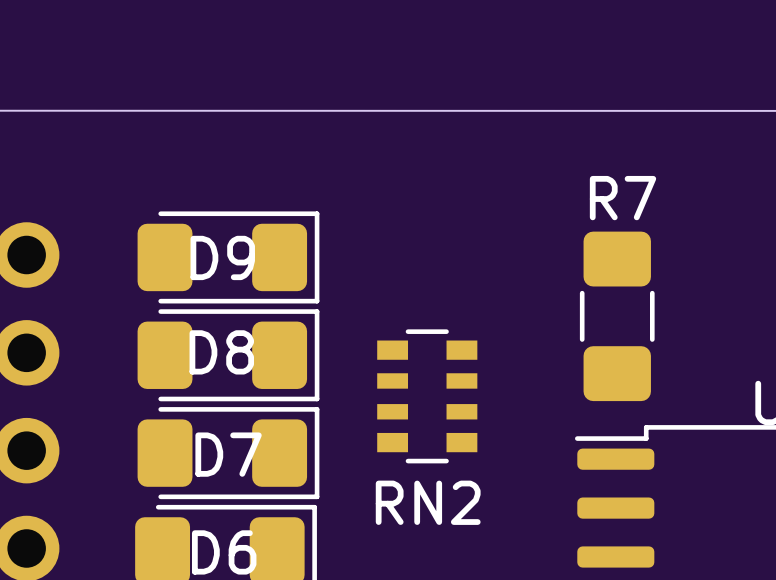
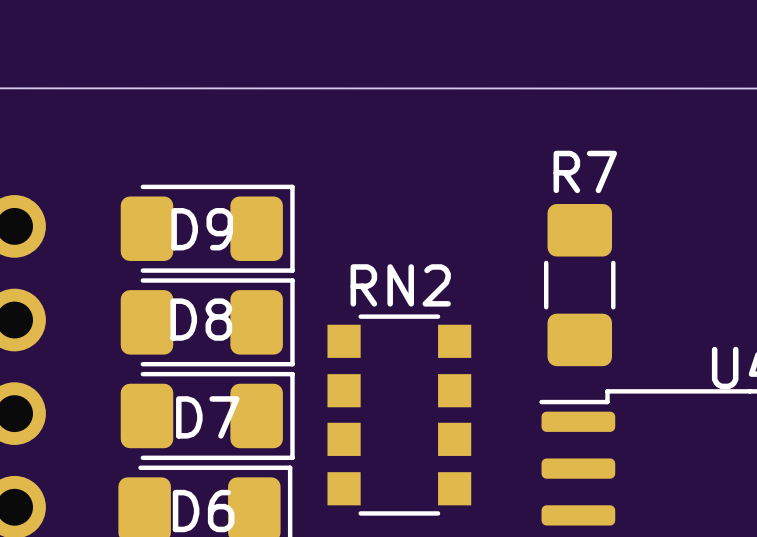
RN2 footprint: [377, 329, 478, 464] -> [327, 314, 472, 516]
RN2 name position: RN2 (428, 502) -> RN2 (400, 285)

